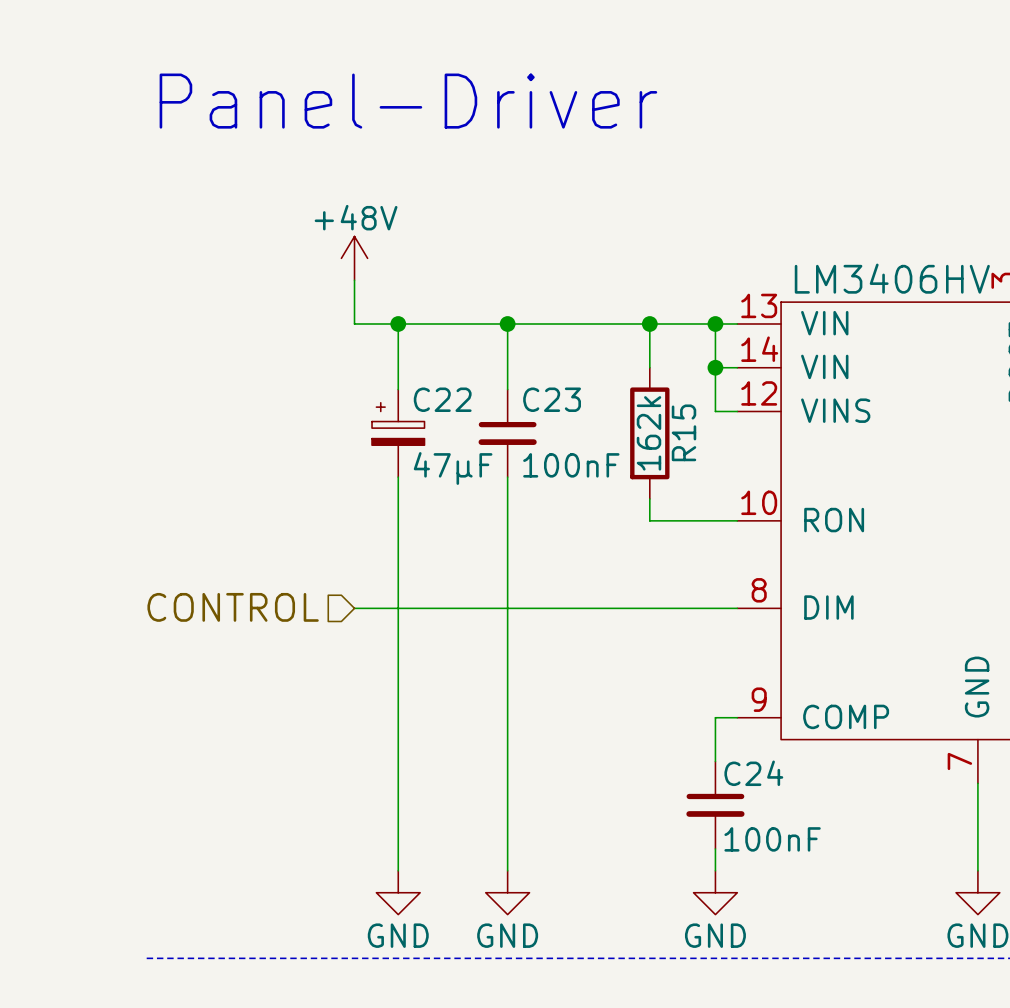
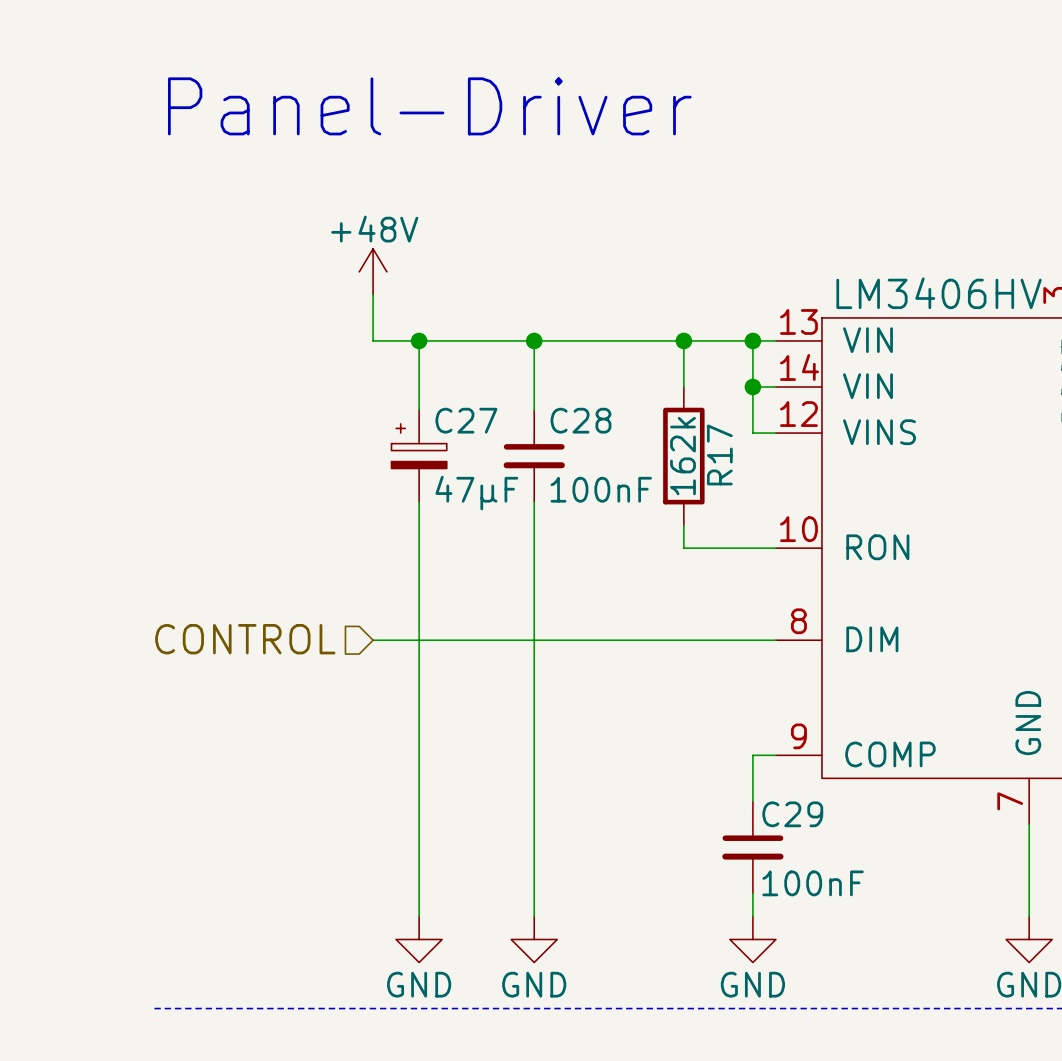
C22 name: C22 (442, 399) -> C27 (466, 420)
C23 name: C23 (552, 399) -> C28 (580, 420)
R15 name: R15 (684, 432) -> R17 (719, 454)
C24 name: C24 (753, 773) -> C29 (792, 814)

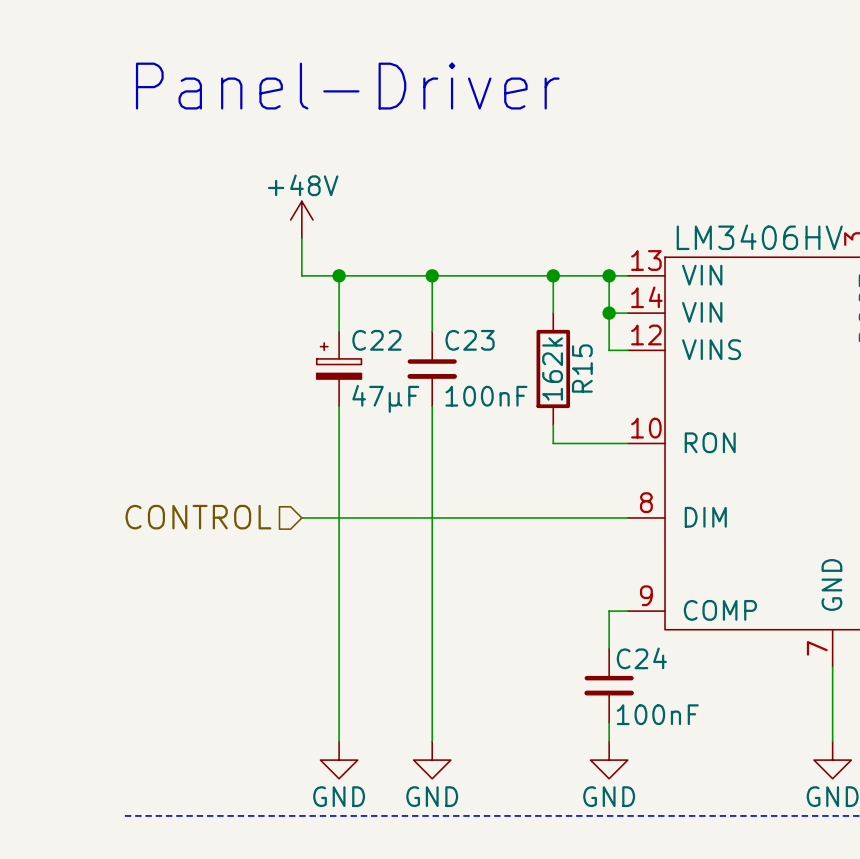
C27 name: C27 (466, 420) -> C22 (376, 340)
C28 name: C28 (580, 420) -> C23 (470, 340)
R17 name: R17 (719, 454) -> R15 (582, 368)
C29 name: C29 (792, 814) -> C24 (641, 658)

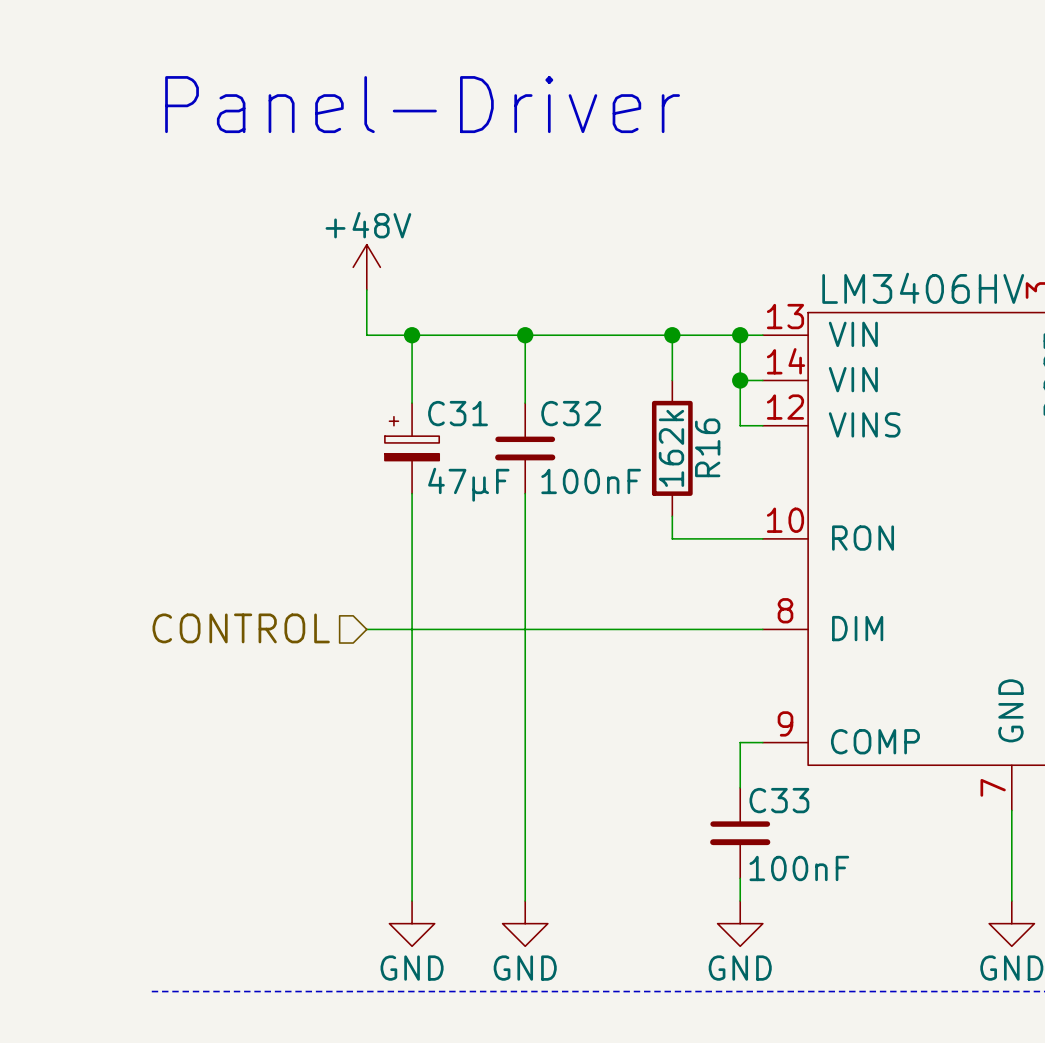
C22 name: C22 (376, 340) -> C31 (458, 413)
C23 name: C23 (470, 340) -> C32 (571, 413)
R15 name: R15 (582, 368) -> R16 (707, 447)
C24 name: C24 (641, 658) -> C33 (779, 800)

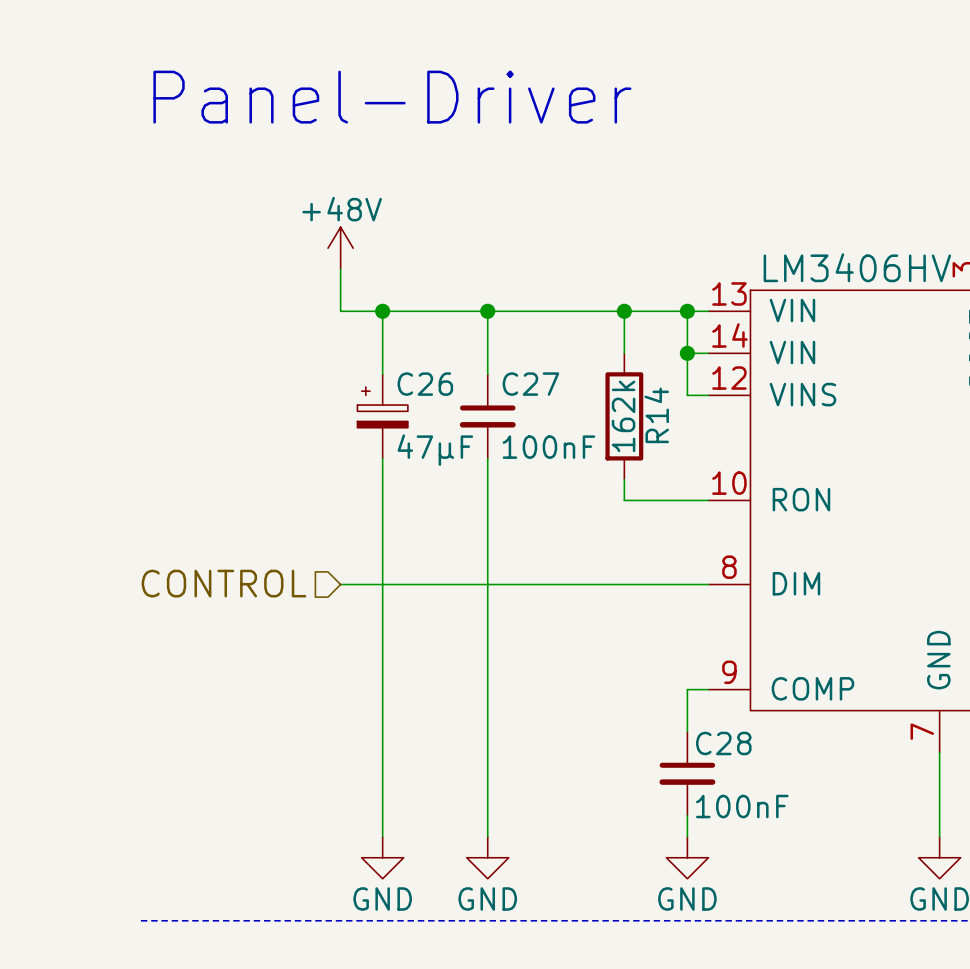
C31 name: C31 (458, 413) -> C26 (425, 384)
C32 name: C32 (571, 413) -> C27 (530, 384)
R16 name: R16 (707, 447) -> R14 (656, 415)
C33 name: C33 (779, 800) -> C28 (723, 743)

